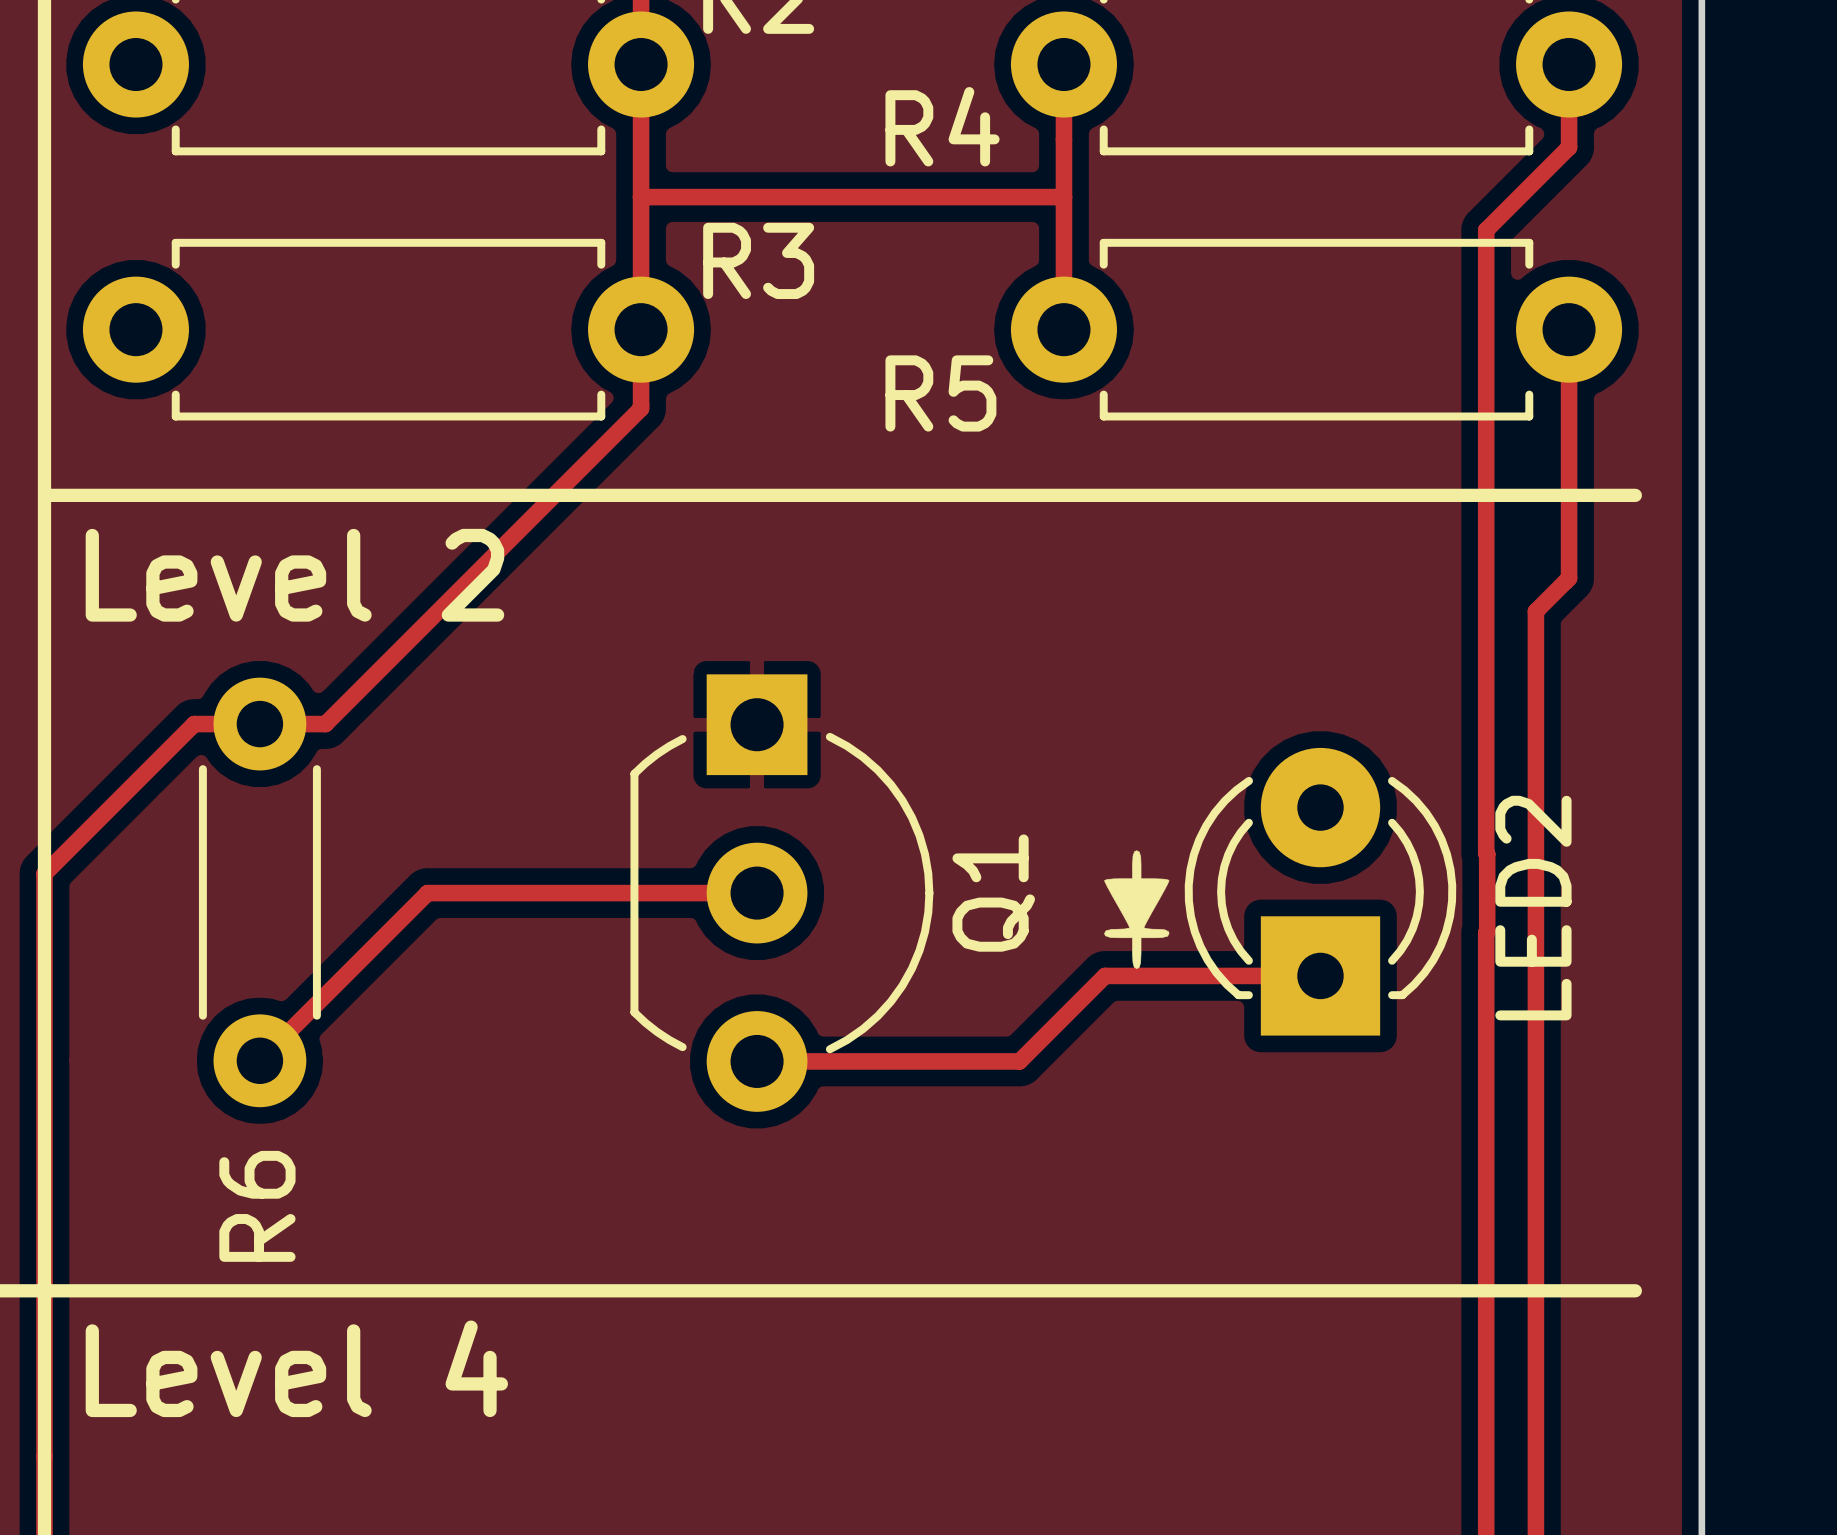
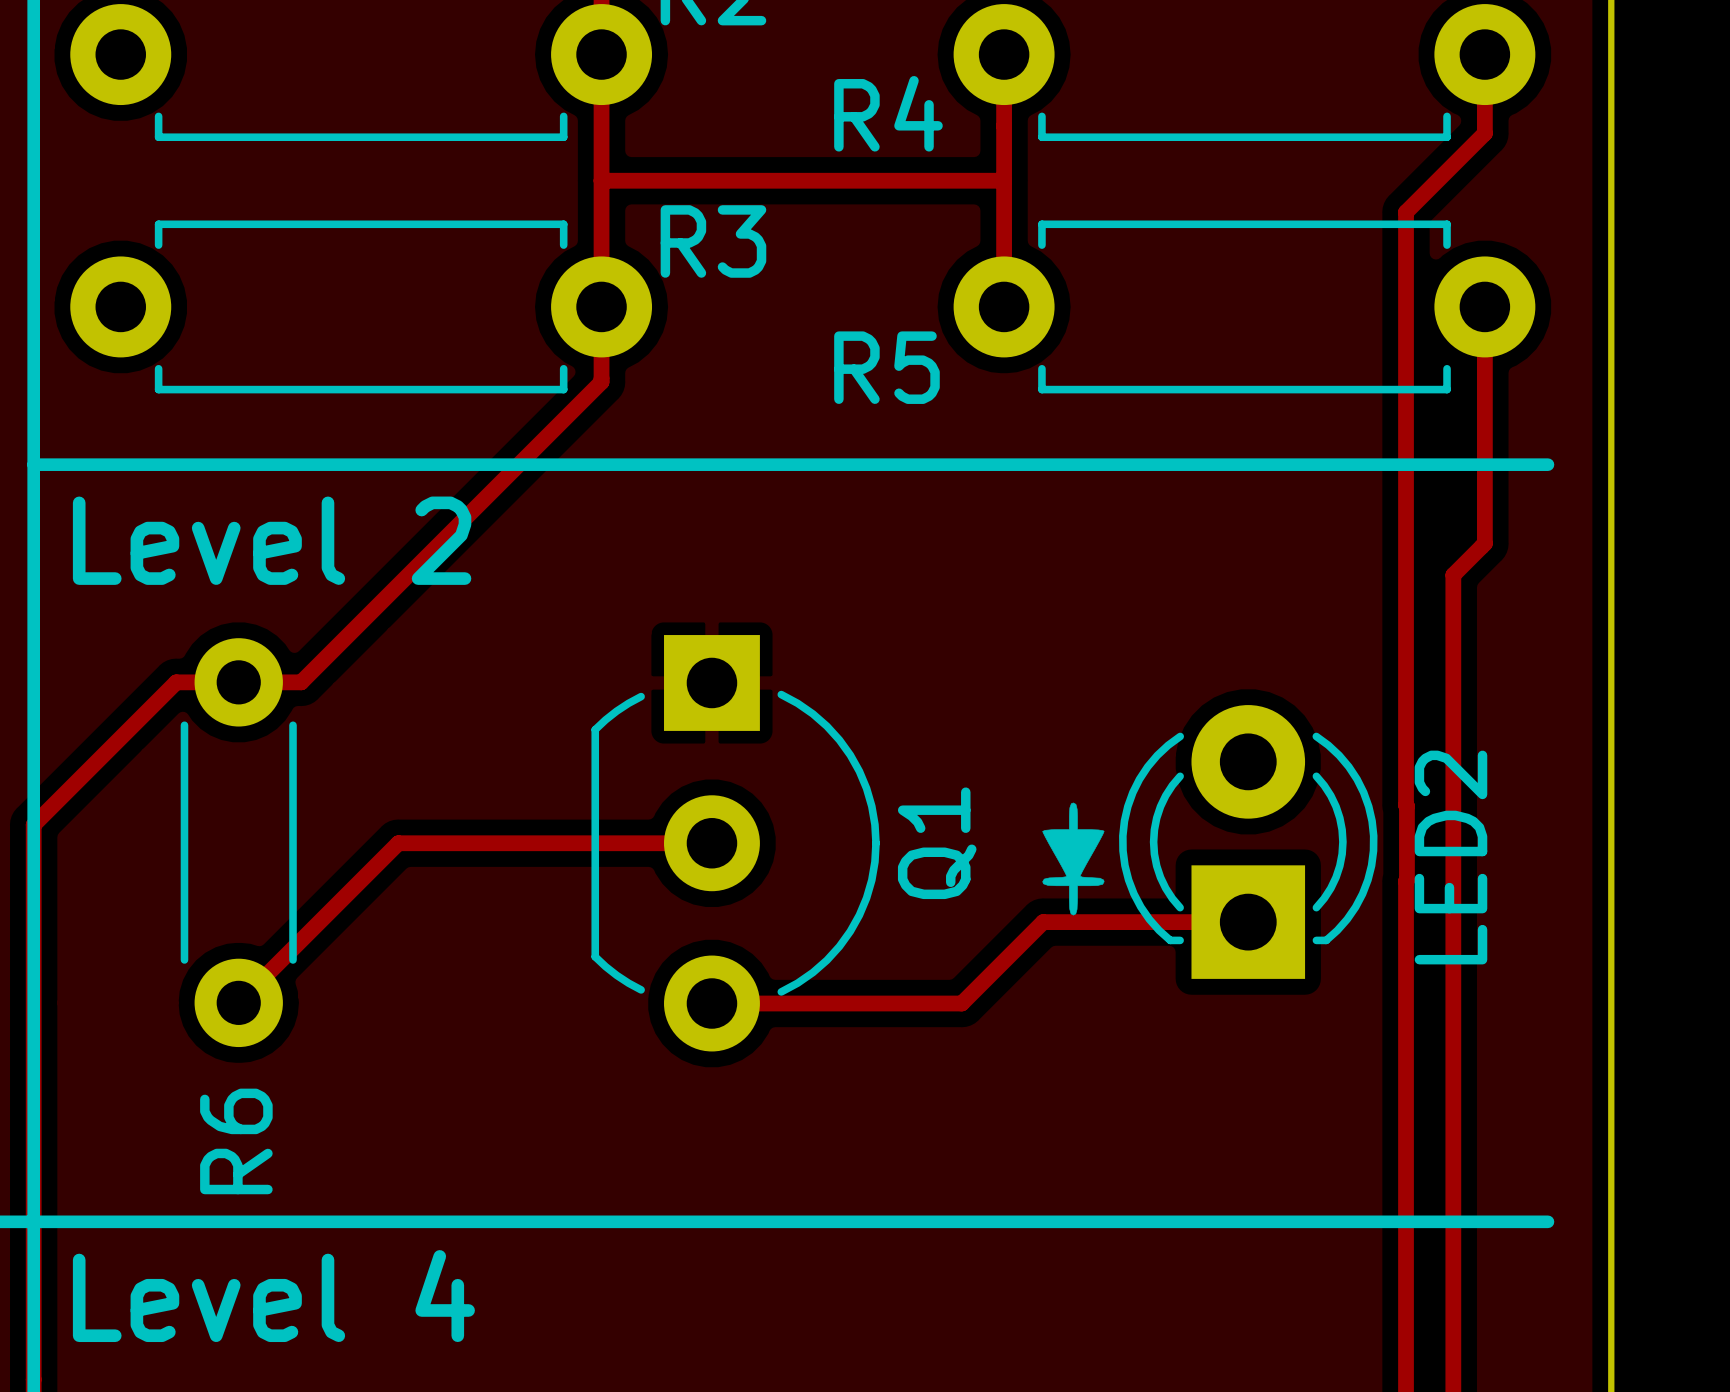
LED2 footprint: [1184, 747, 1457, 1036] -> [1119, 705, 1378, 979]

